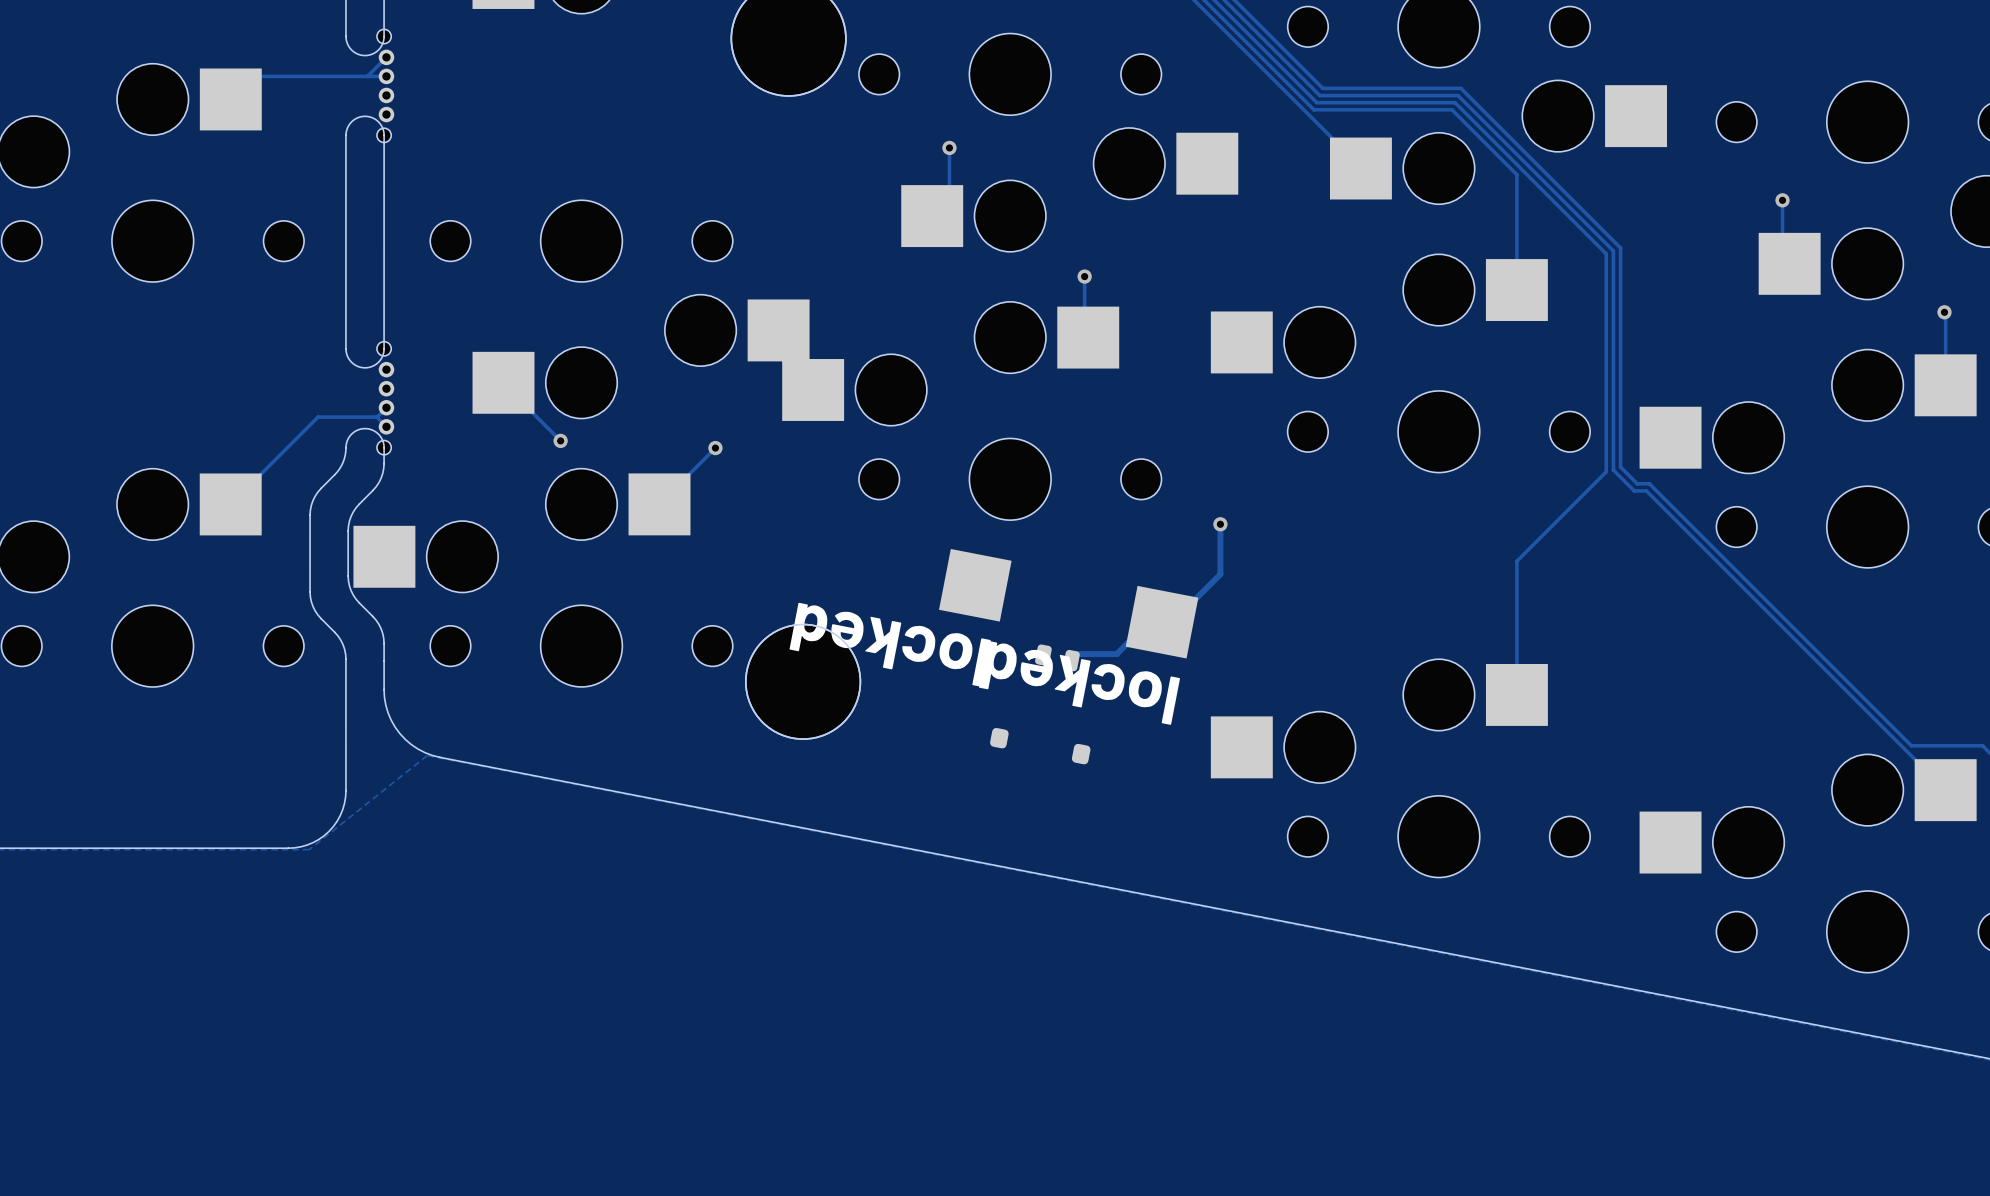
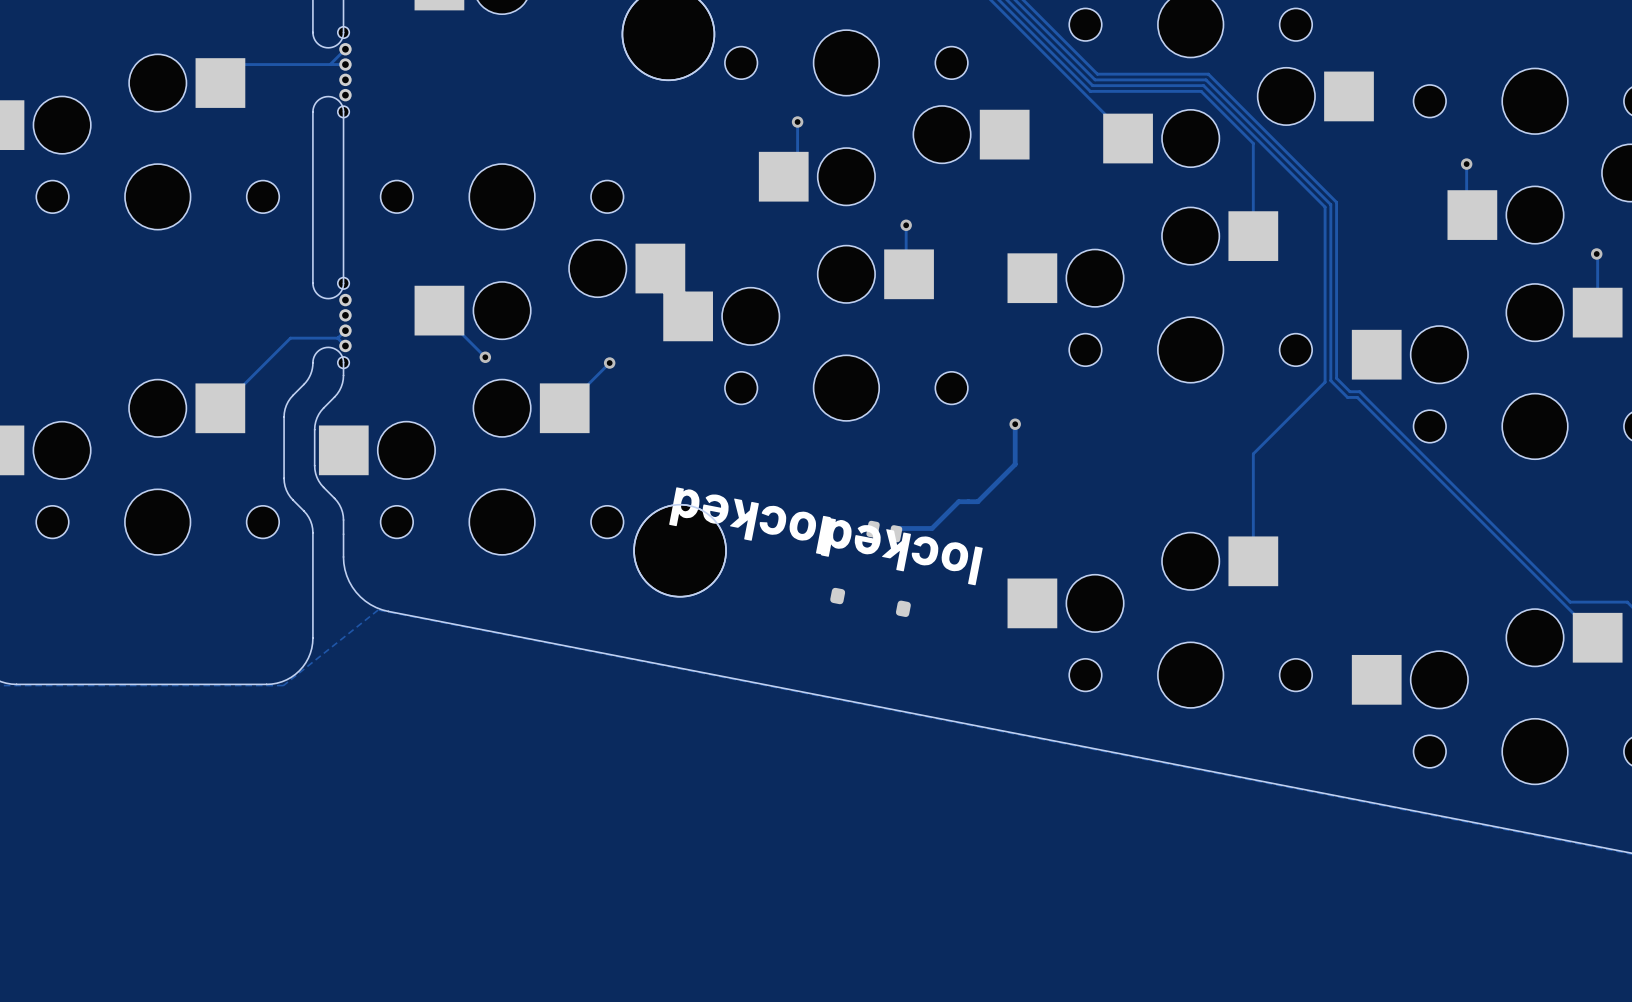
part: (975, 585) -> none
part: (1162, 622) -> none

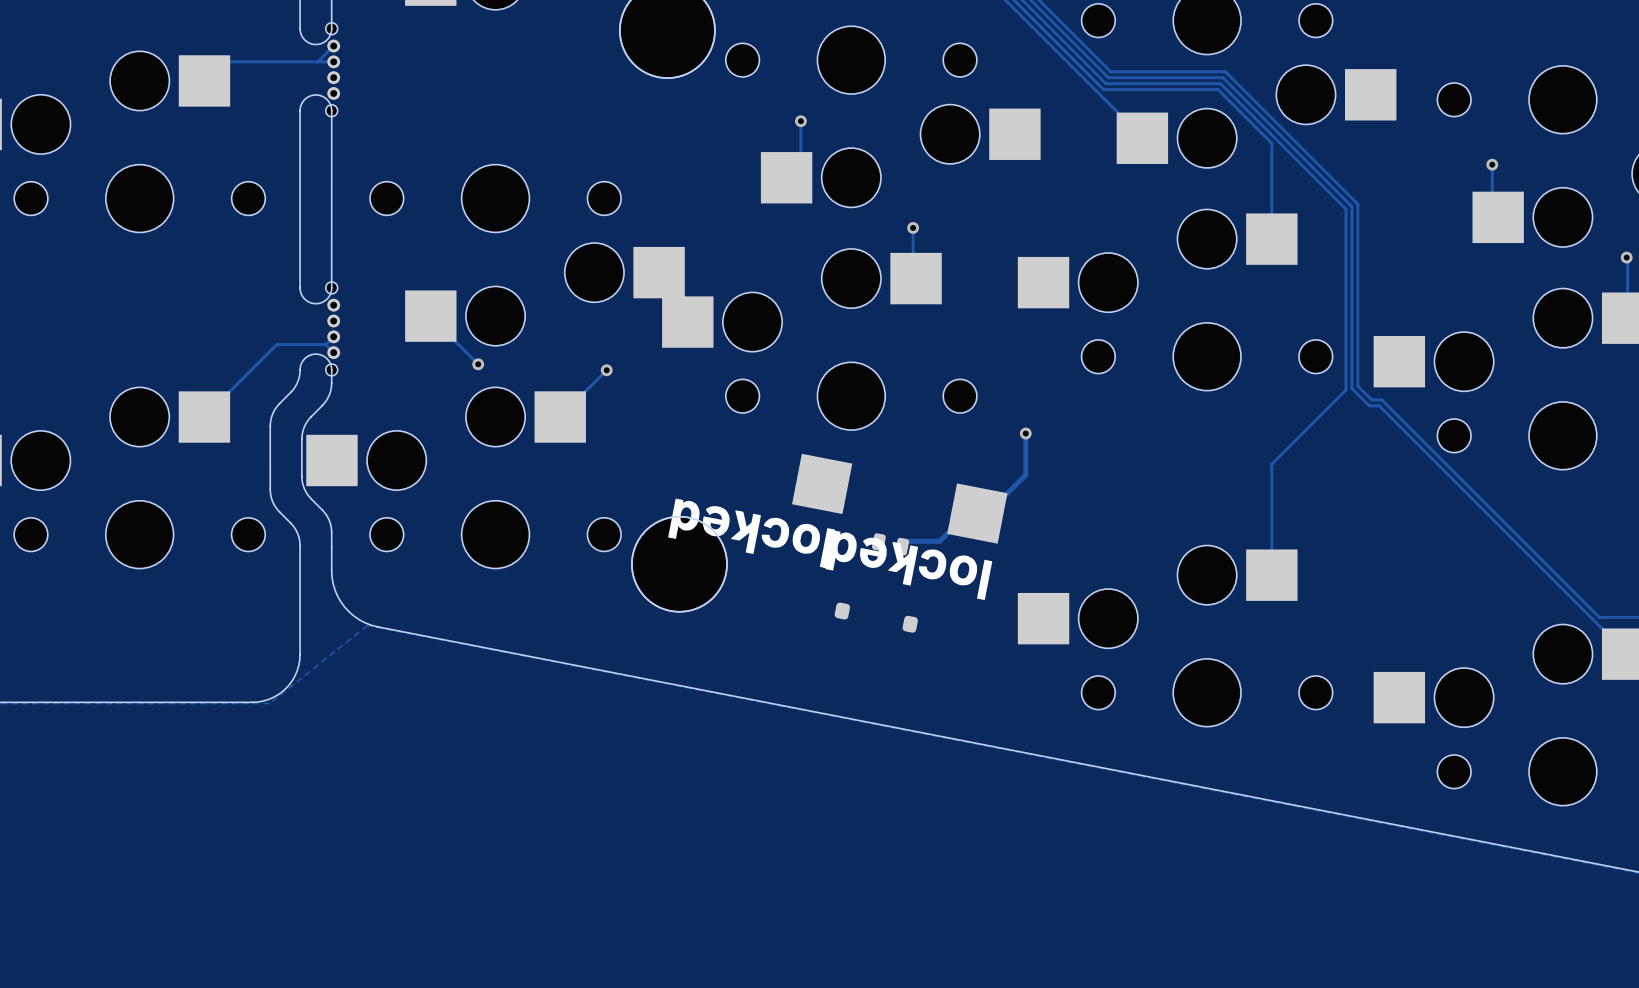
part: none -> (822, 483)
part: none -> (977, 513)

